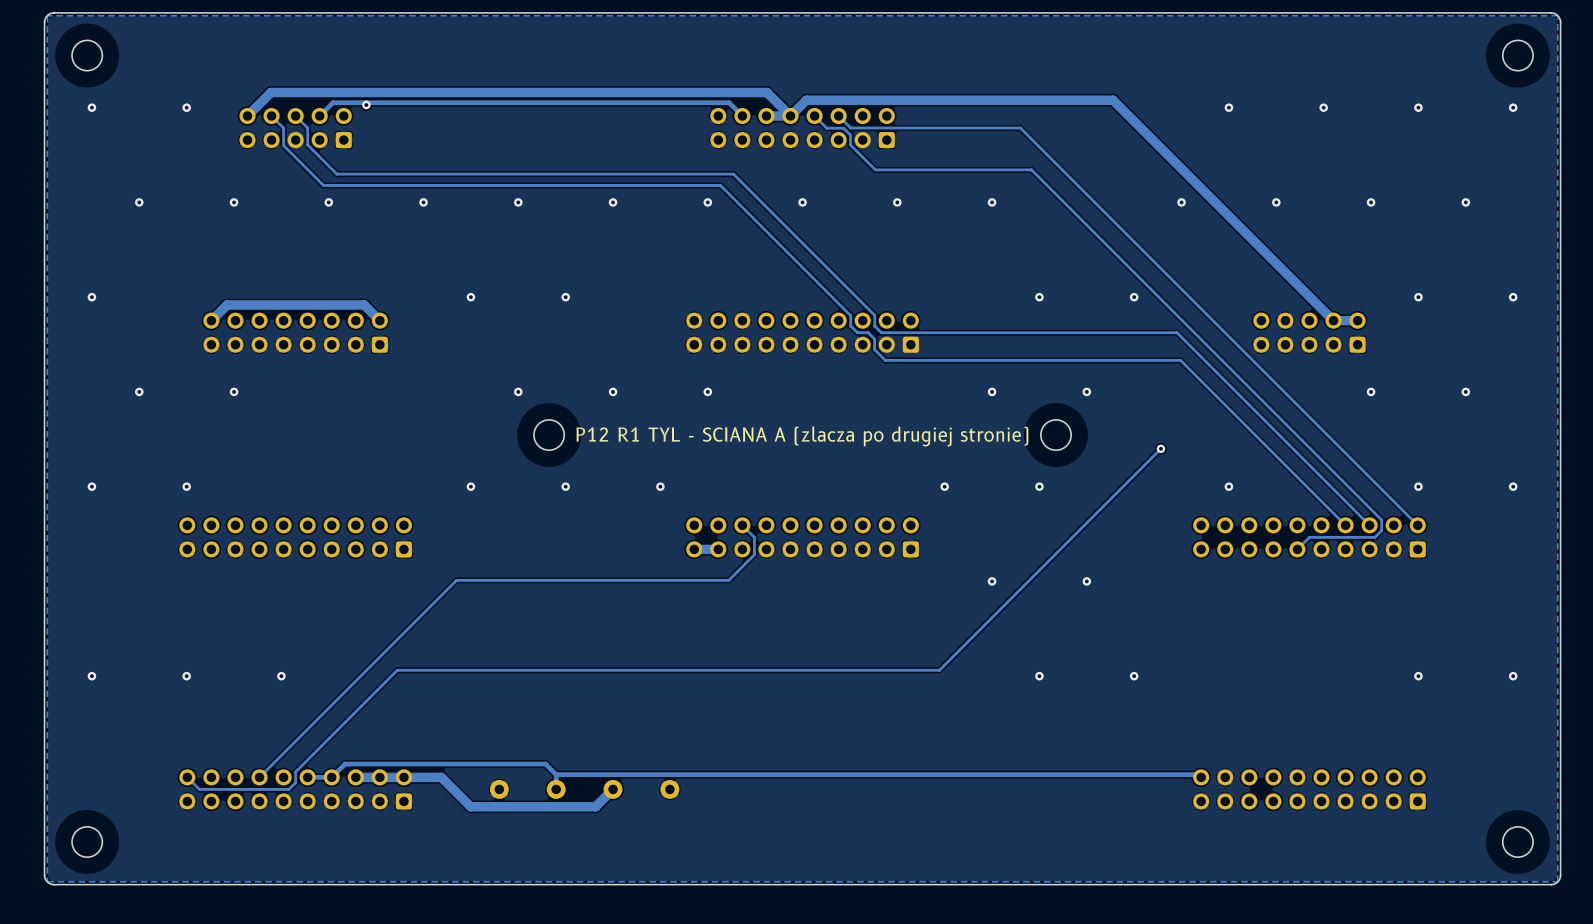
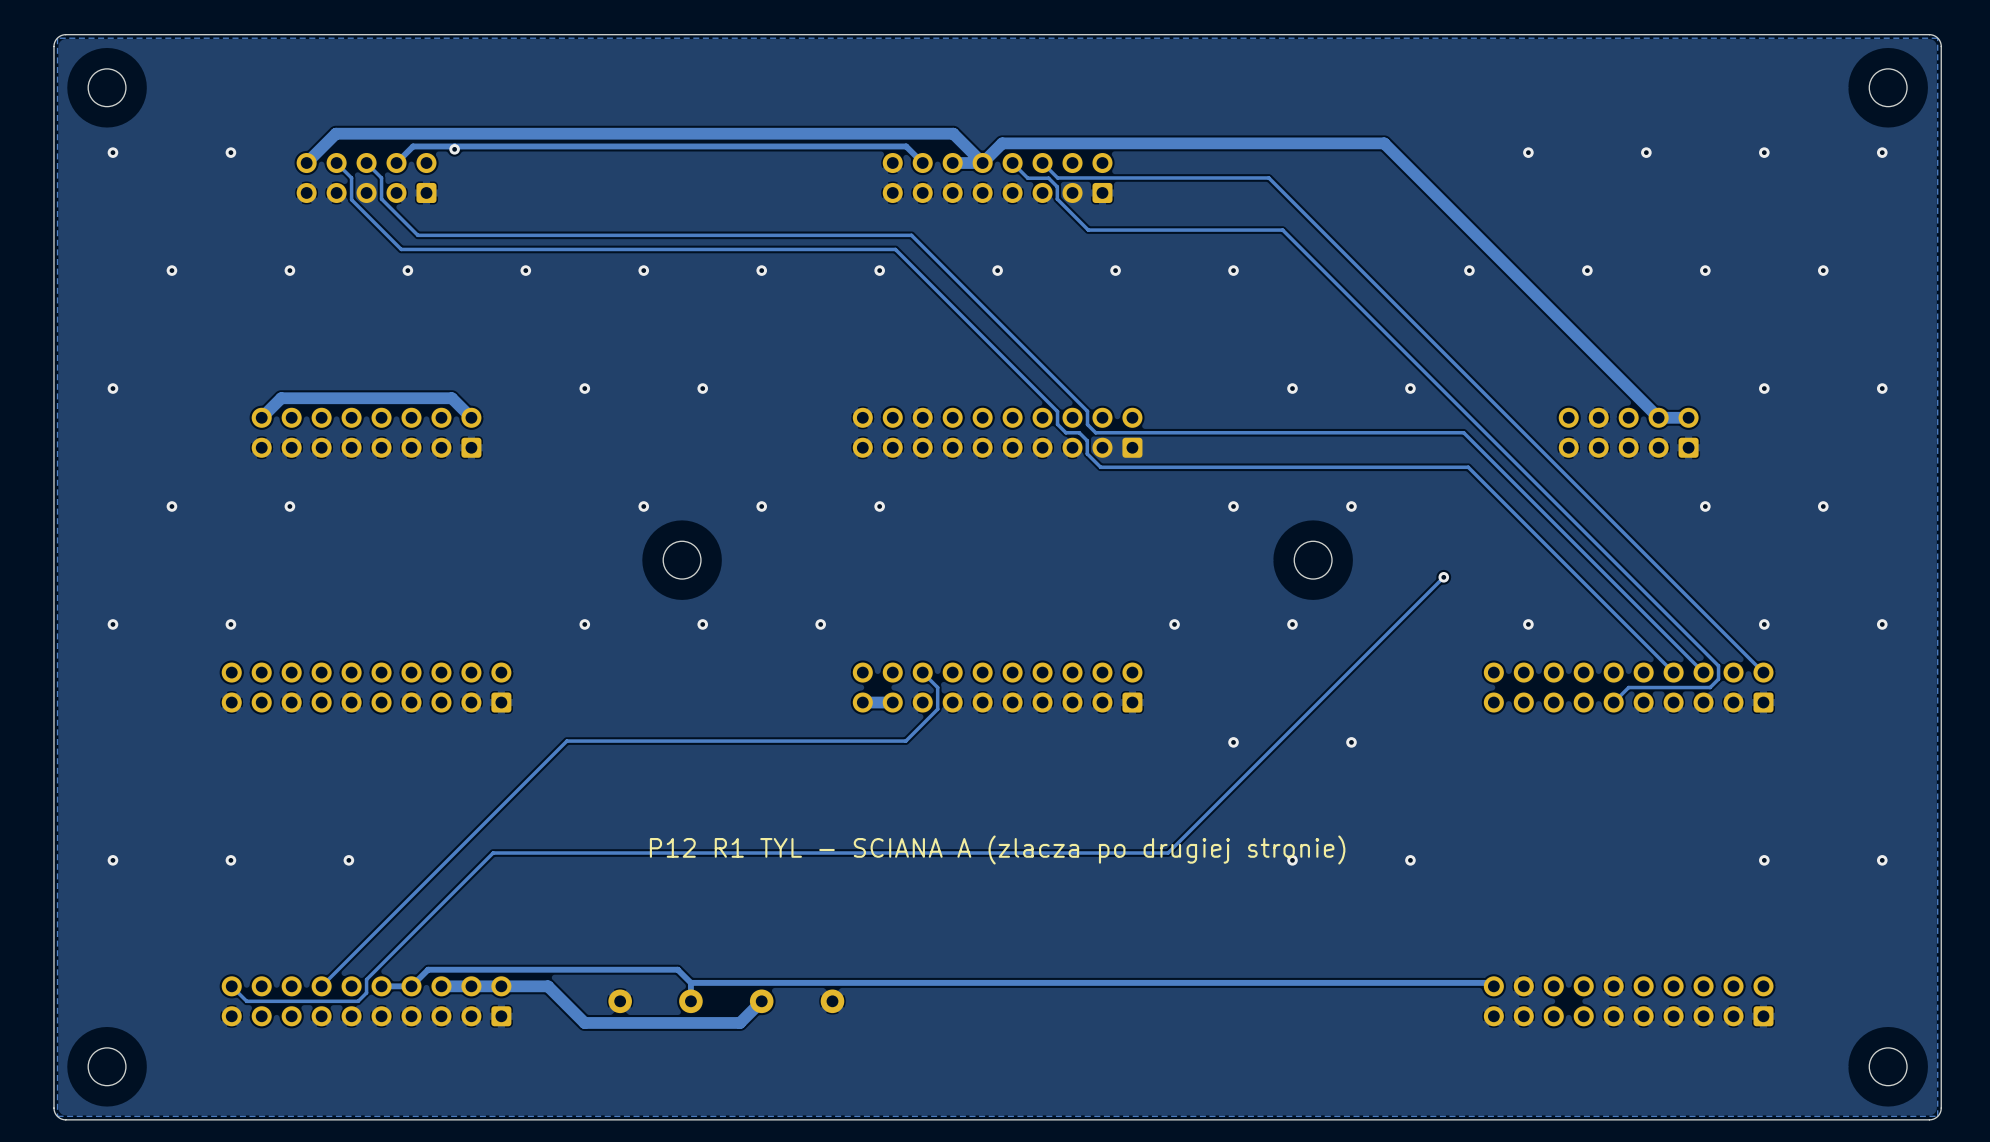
text position: P12 R1 TYL - SCIANA A (zlacza po drugiej stronie) (802, 436) -> P12 R1 TYL - SCIANA A (zlacza po drugiej stronie) (997, 850)

